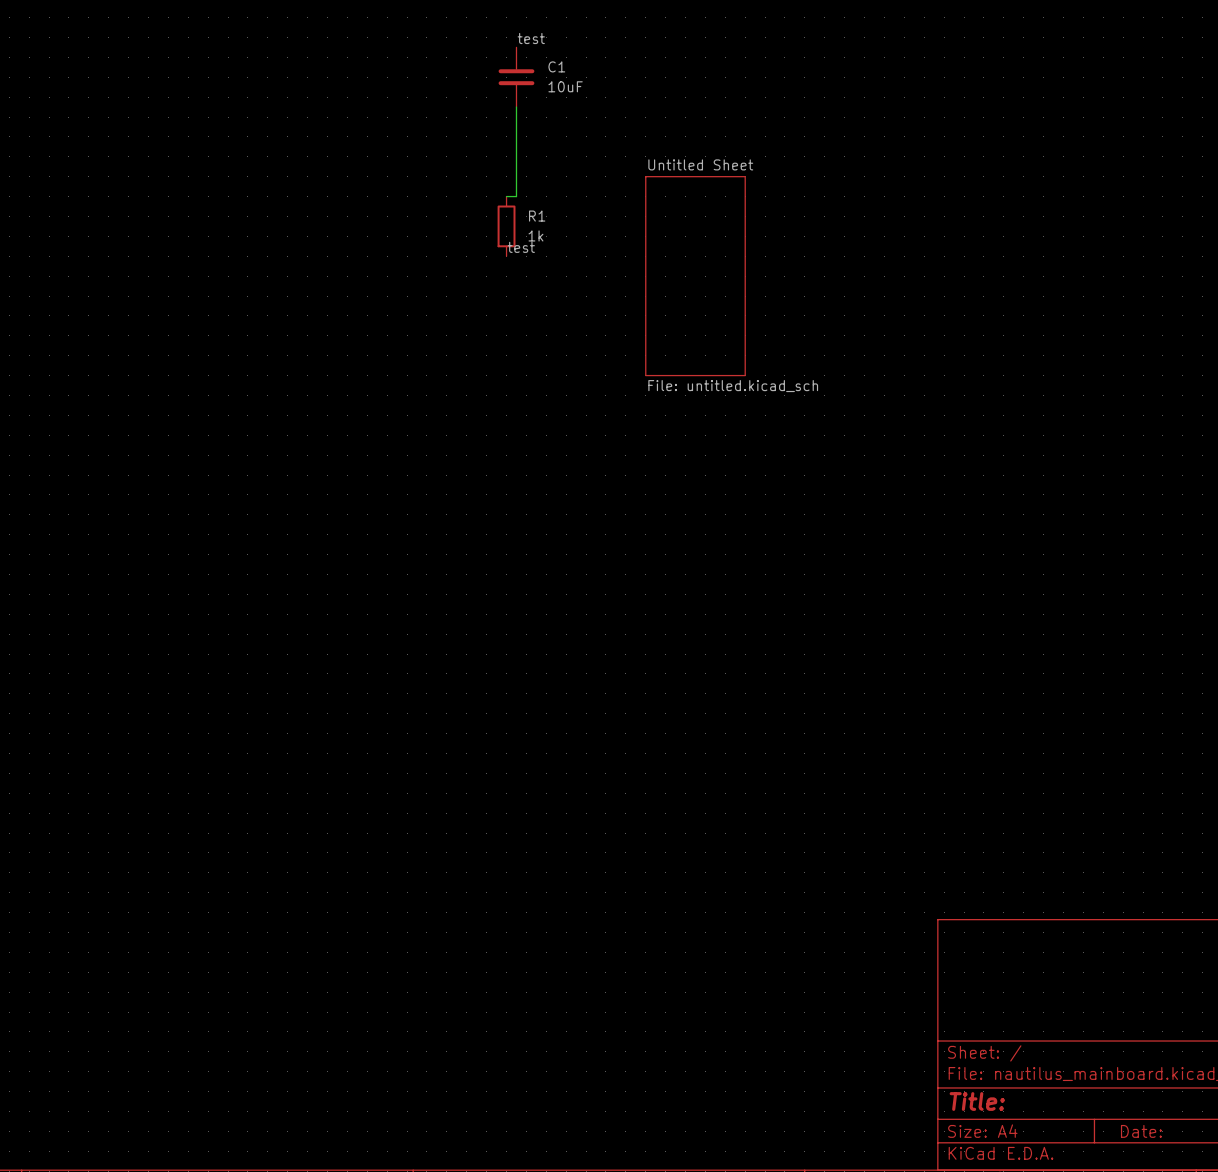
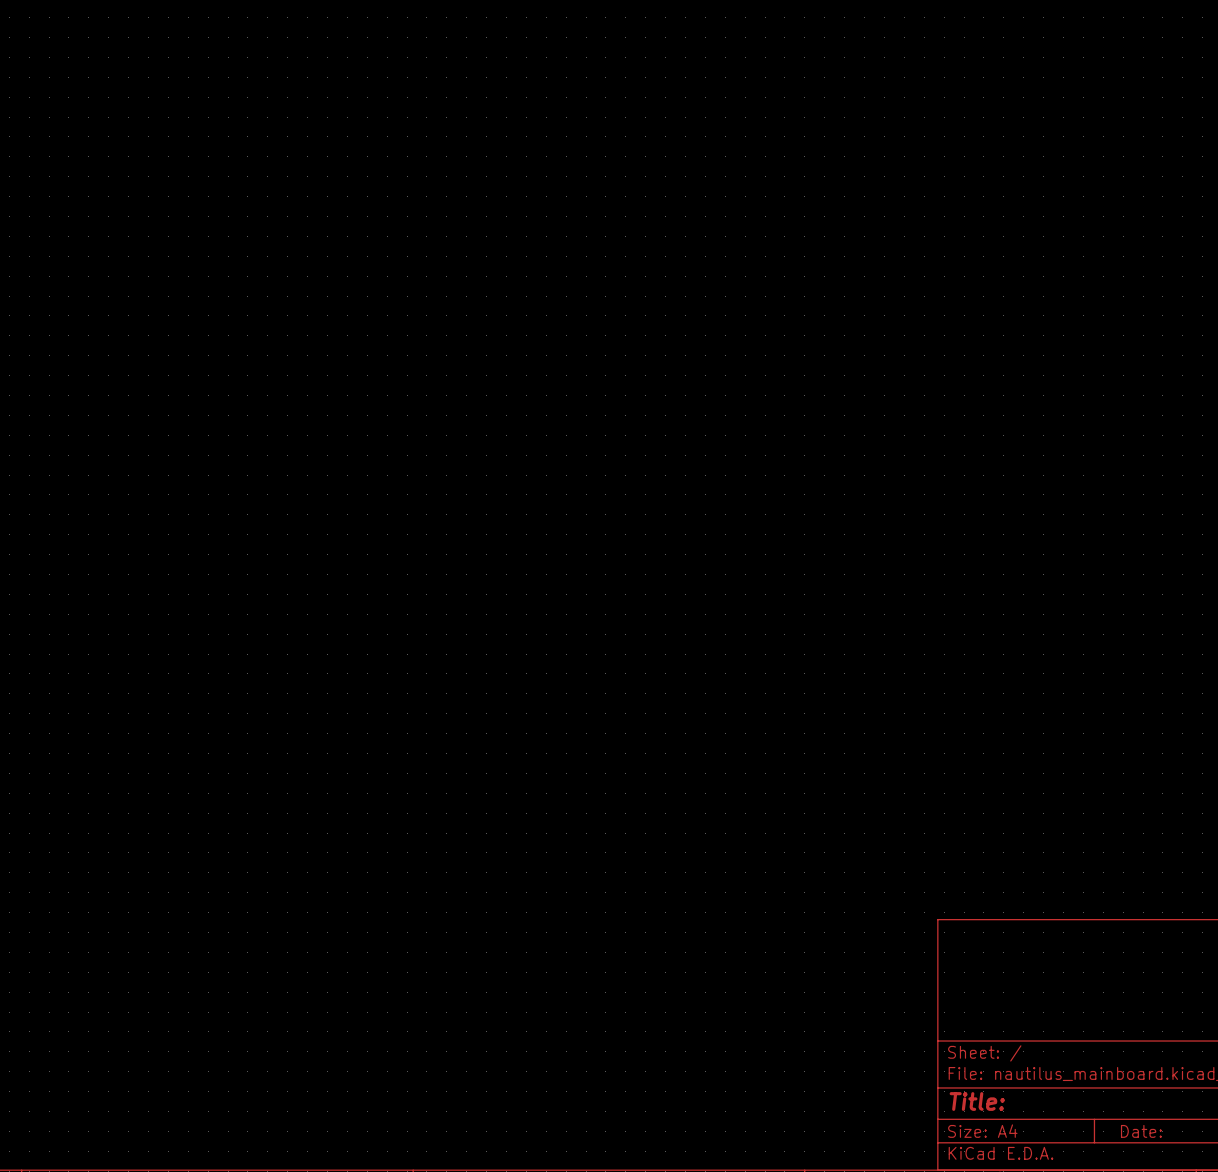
label: test (531, 38) -> none
C1: 10uF (516, 77) -> none
wire: (516, 107) (516, 196) (506, 196) -> none
R1: 1k (506, 226) -> none
label: test (521, 247) -> none
sheet Untitled Sheet: File: untitled.kicad_sch (695, 276) -> none

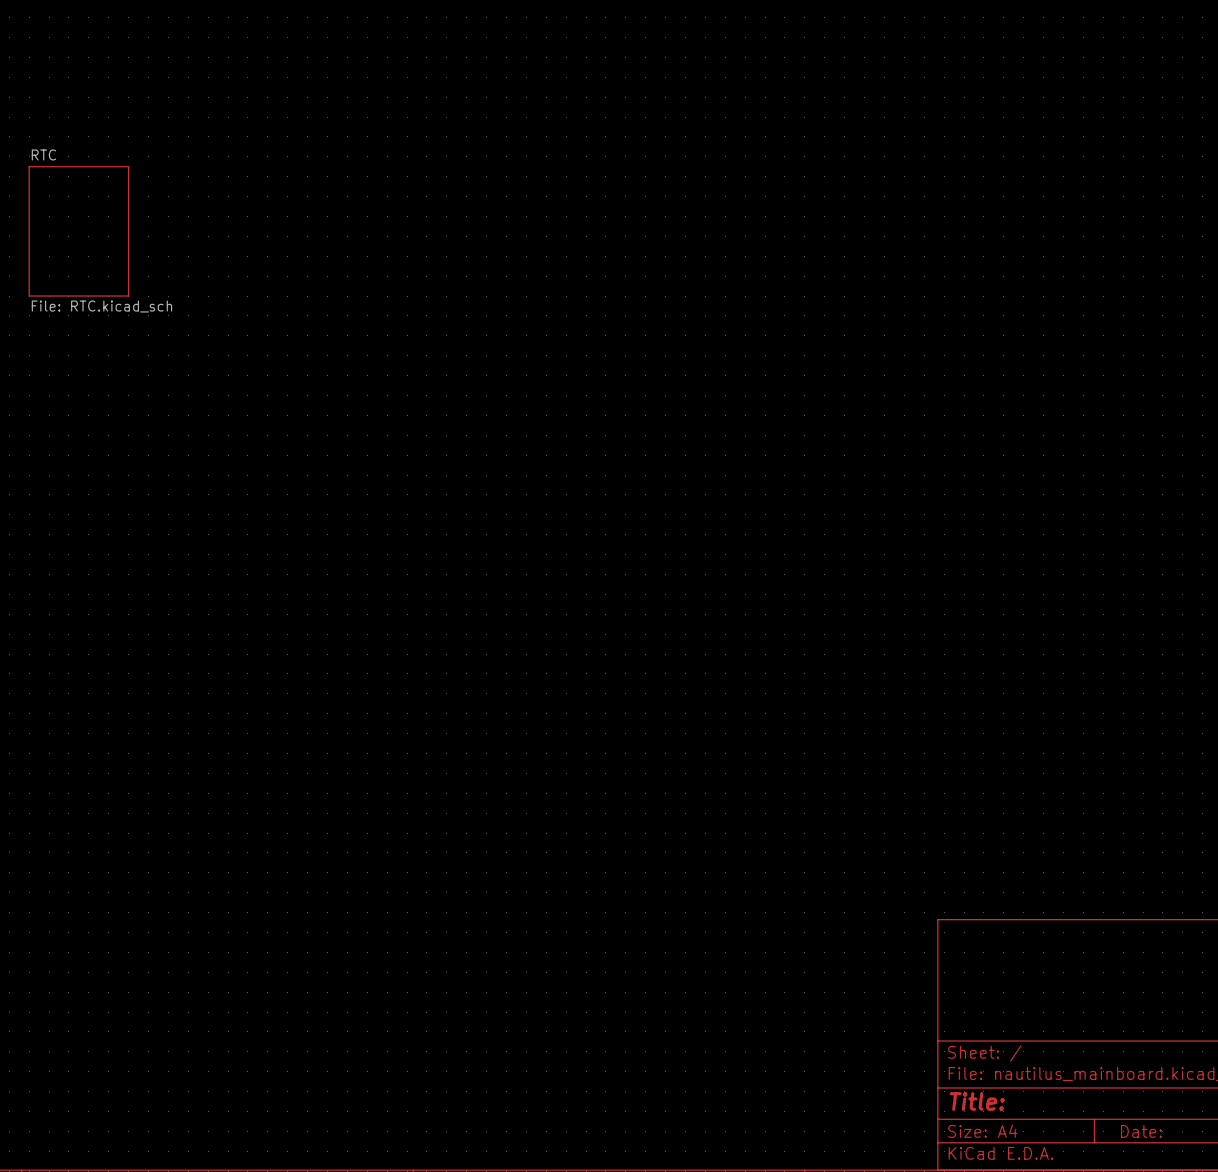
sheet RTC: none -> File: RTC.kicad_sch (78, 231)

